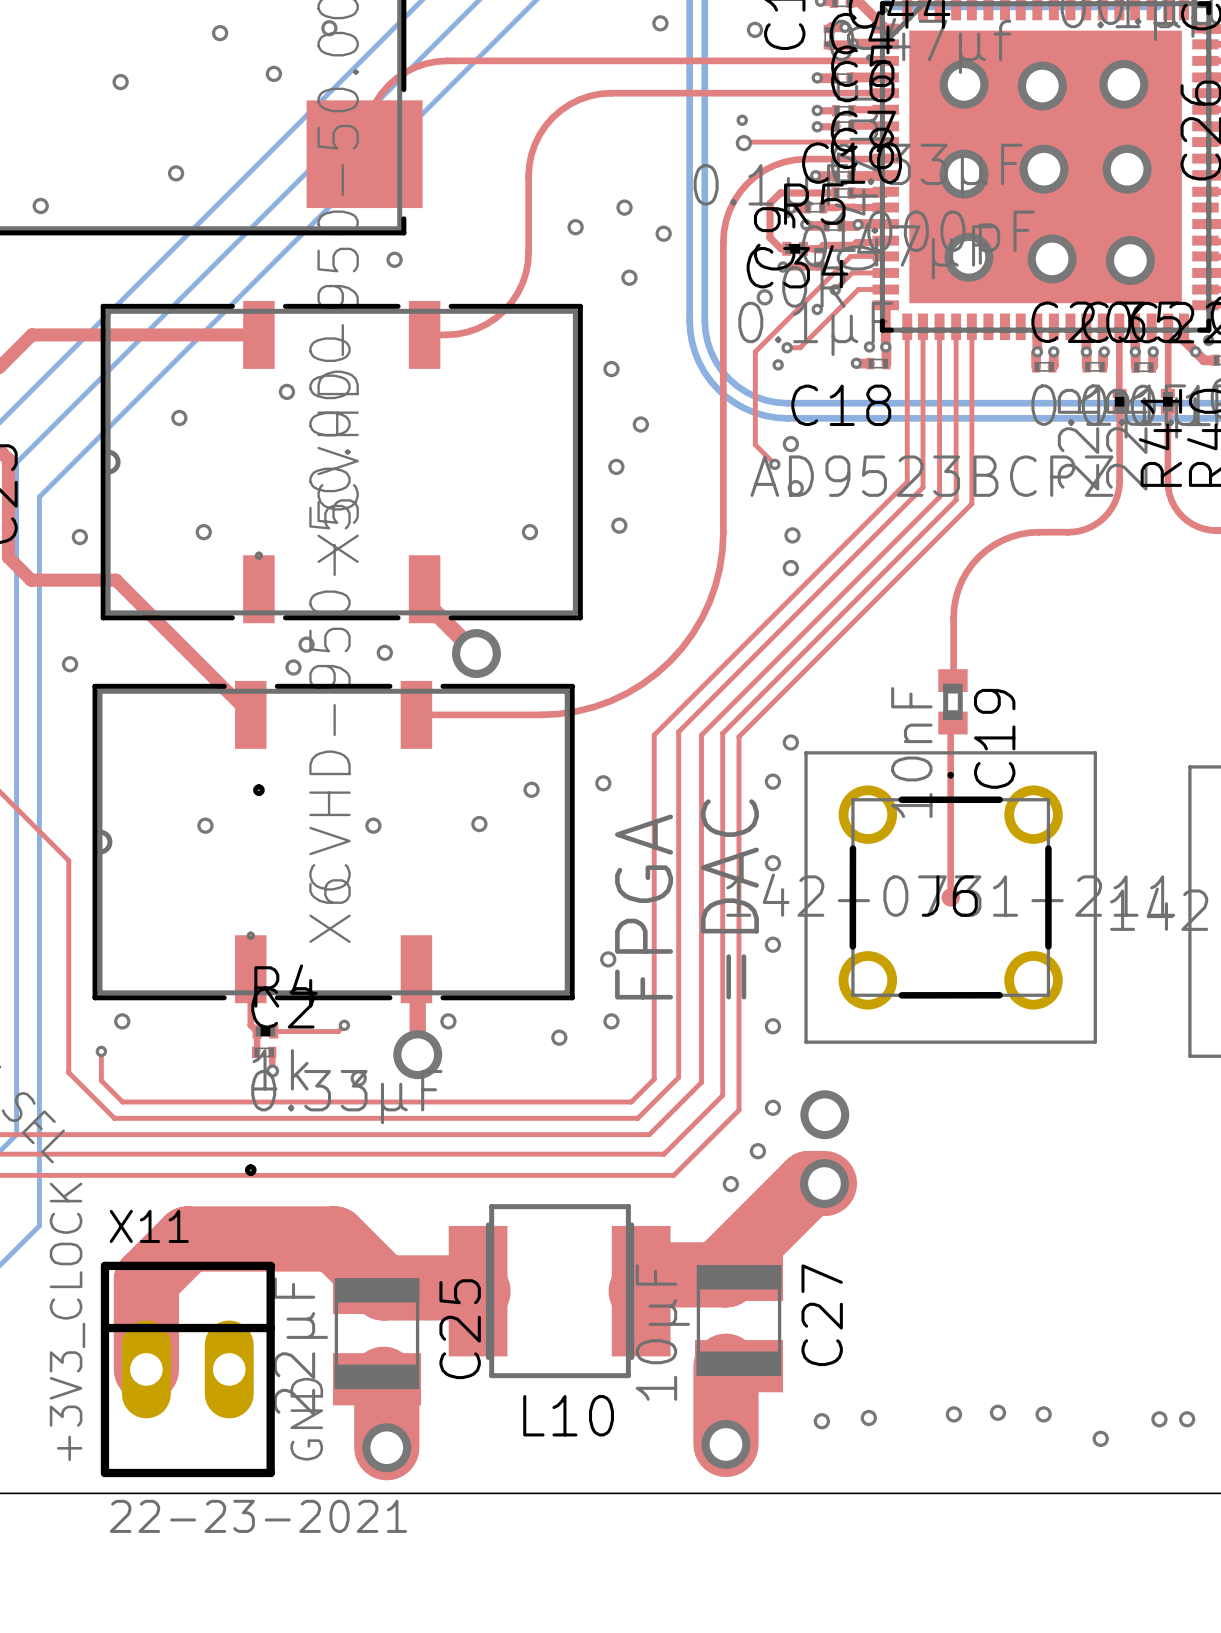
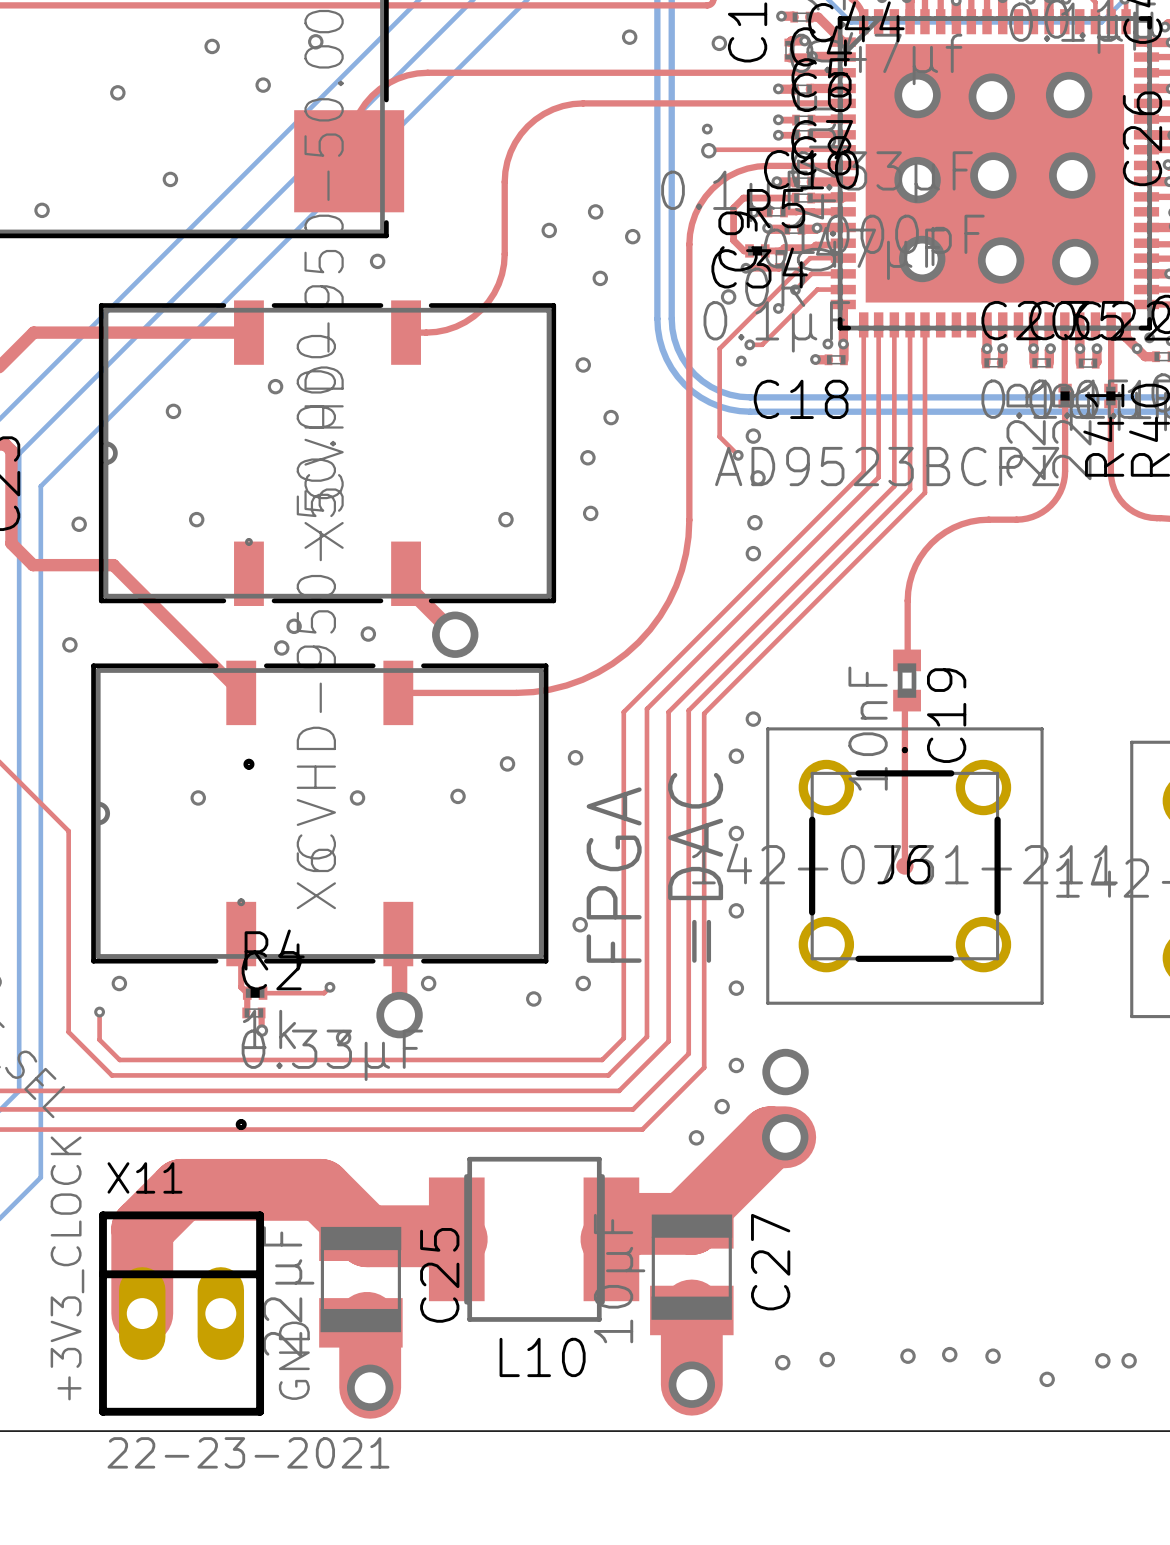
C27 position: (739, 1320) -> (691, 1267)

